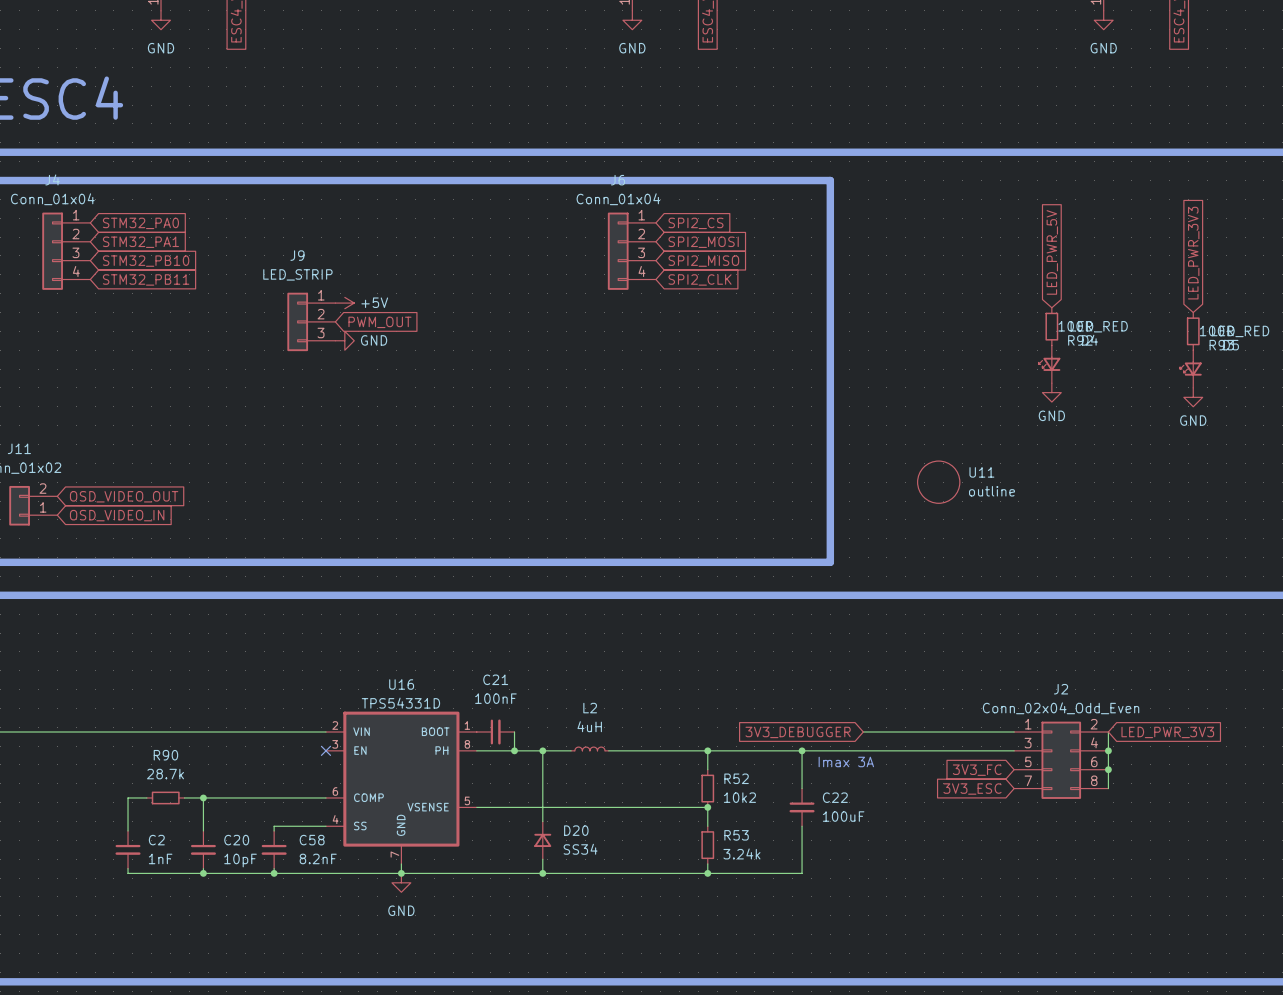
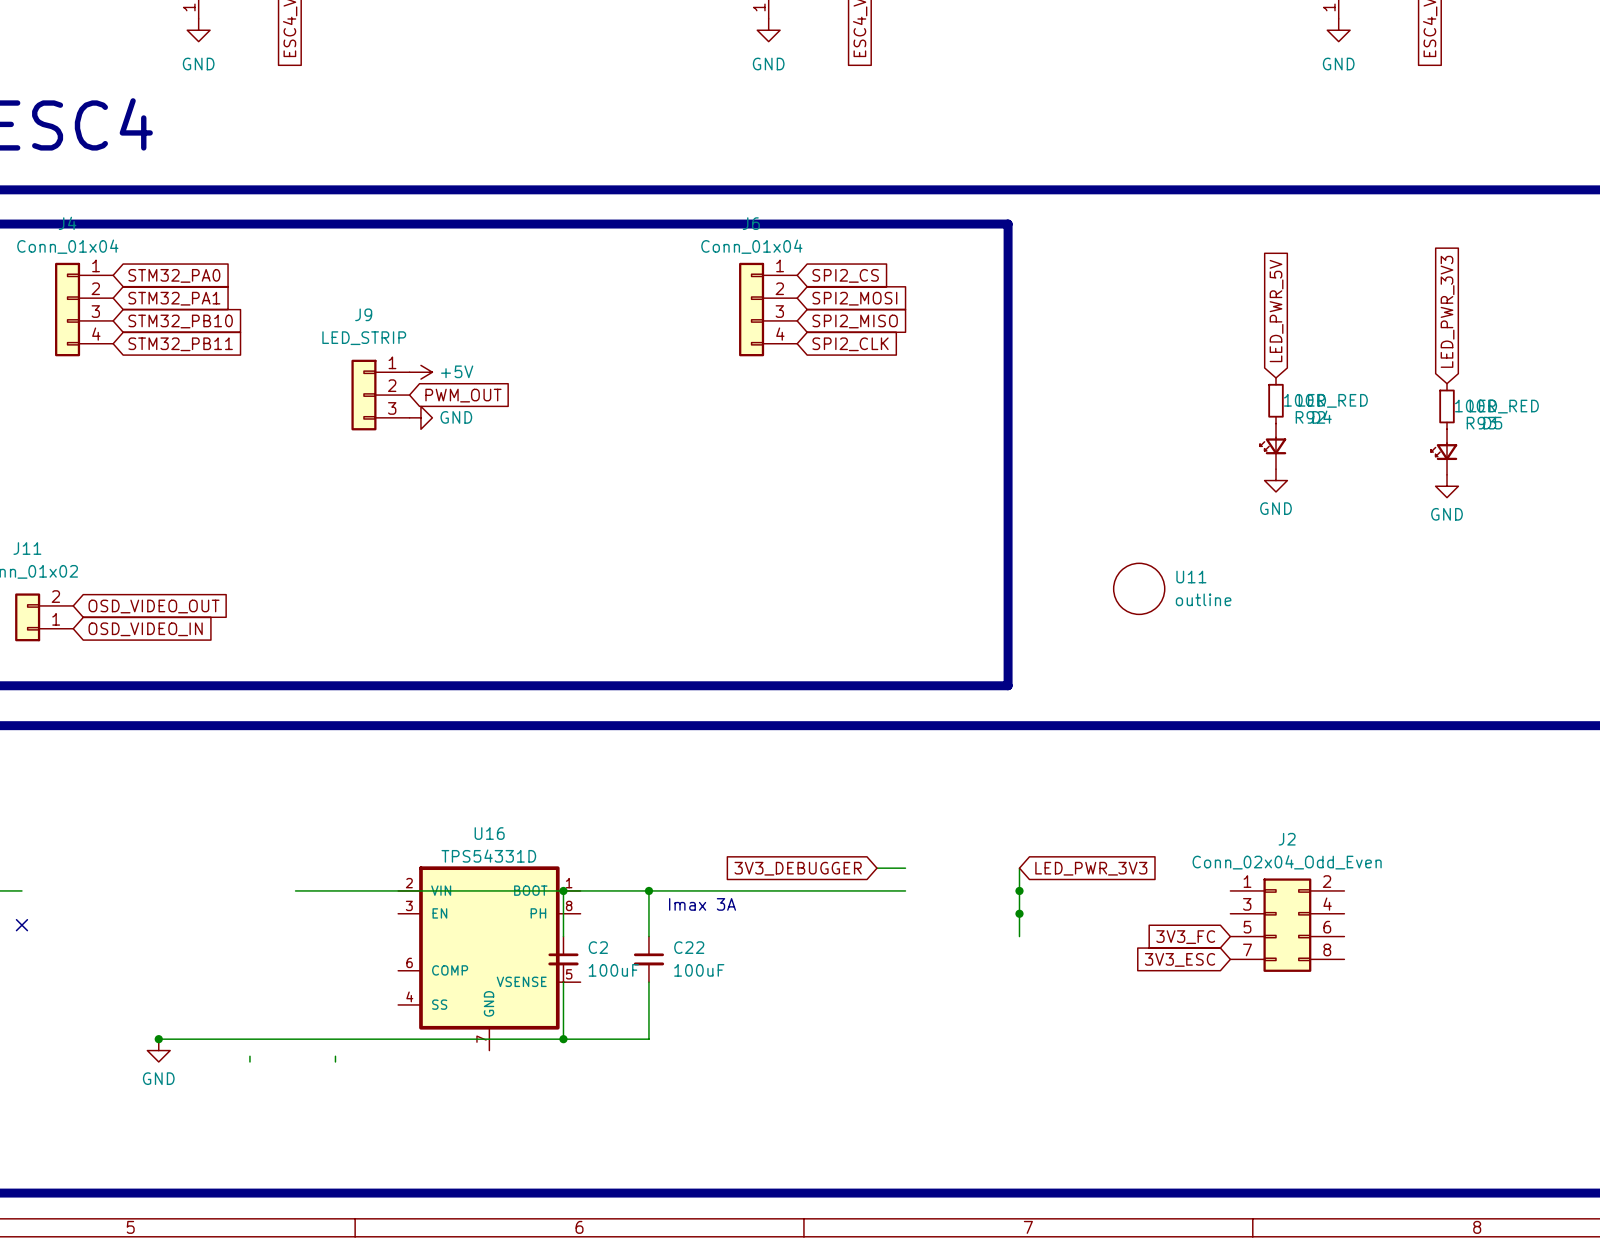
wire: none -> (876, 868) (905, 868)
wire: none -> (1019, 868) (1019, 936)
global label: none -> LED_PWR_3V3 (1091, 868)
wire: (14, 731) (241, 731) -> none
wire: none -> (398, 890) (905, 890)
wire: none -> (563, 890) (563, 936)
junction: none -> (563, 890)
C21: 100nF (495, 731) -> none
wire: (514, 731) (514, 750) -> none
wire: none -> (648, 890) (648, 936)
junction: none -> (648, 890)
junction: none -> (1019, 890)
wire: (863, 731) (1014, 731) -> none
wire: (1108, 731) (1108, 788) -> none
global label position: 3V3_DEBUGGER (798, 732) -> 3V3_DEBUGGER (798, 868)
global label: LED_PWR_3V3 (1167, 732) -> none
text: none -> Imax 3A (702, 904)
L2: 4uH (589, 748) -> none
no-connect mark: (325, 750) -> none
wire: (476, 750) (571, 750) -> none
junction: (514, 750) -> none
wire: (542, 750) (542, 821) -> none
junction: (542, 750) -> none
wire: (608, 750) (1014, 750) -> none
wire: (707, 750) (707, 769) -> none
junction: (707, 750) -> none
wire: (802, 750) (802, 788) -> none
junction: (802, 750) -> none
junction: none -> (1019, 913)
junction: (1108, 750) -> none
no-connect mark: none -> (21, 925)
text: Imax 3A (846, 761) -> none
junction: (1108, 769) -> none
R52: 10k2 (707, 788) -> none
wire: (146, 797) (128, 797) (128, 830) -> none
R90: 28.7k (165, 797) -> none
wire: (184, 797) (325, 797) -> none
wire: (203, 797) (203, 830) -> none
junction: (203, 797) -> none
wire: none -> (563, 982) (563, 1039)
wire: (476, 807) (707, 807) (707, 826) -> none
wire: none -> (648, 982) (648, 1039) (158, 1039)
junction: (707, 807) -> none
C22 position: (802, 807) -> (648, 959)
wire: (325, 826) (274, 826) (274, 830) -> none
wire: (802, 826) (802, 873) (128, 873) (128, 868) -> none
D20: SS34 (542, 840) -> none
R53: 3.24k (707, 845) -> none
C2 position: (128, 849) -> (563, 959)
C20: 10pF (203, 849) -> none
C58: 8.2nF (274, 849) -> none
junction: none -> (158, 1039)
junction: none -> (563, 1039)
C2 value: 1nF (160, 858) -> 100uF (613, 970)
wire: (542, 859) (542, 873) -> none
power symbol: none -> GND (158, 1050)
wire: (401, 863) (401, 873) -> none
wire: (707, 863) (707, 873) -> none
junction: (203, 873) -> none
junction: (274, 873) -> none
junction: (401, 873) -> none
junction: (542, 873) -> none
junction: (707, 873) -> none
power symbol: GND (401, 882) -> none

